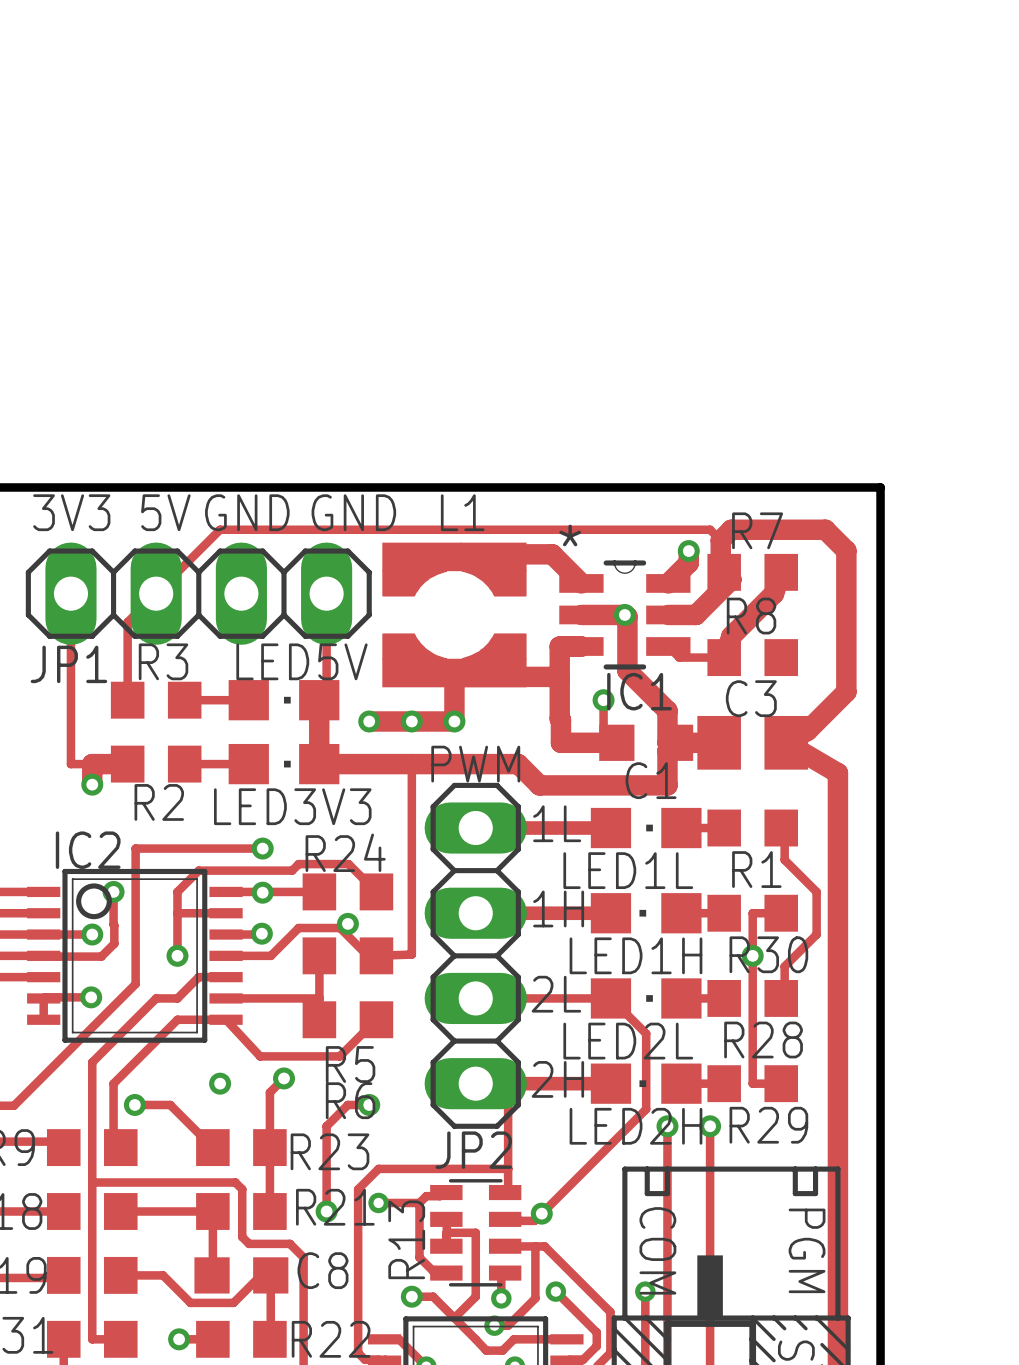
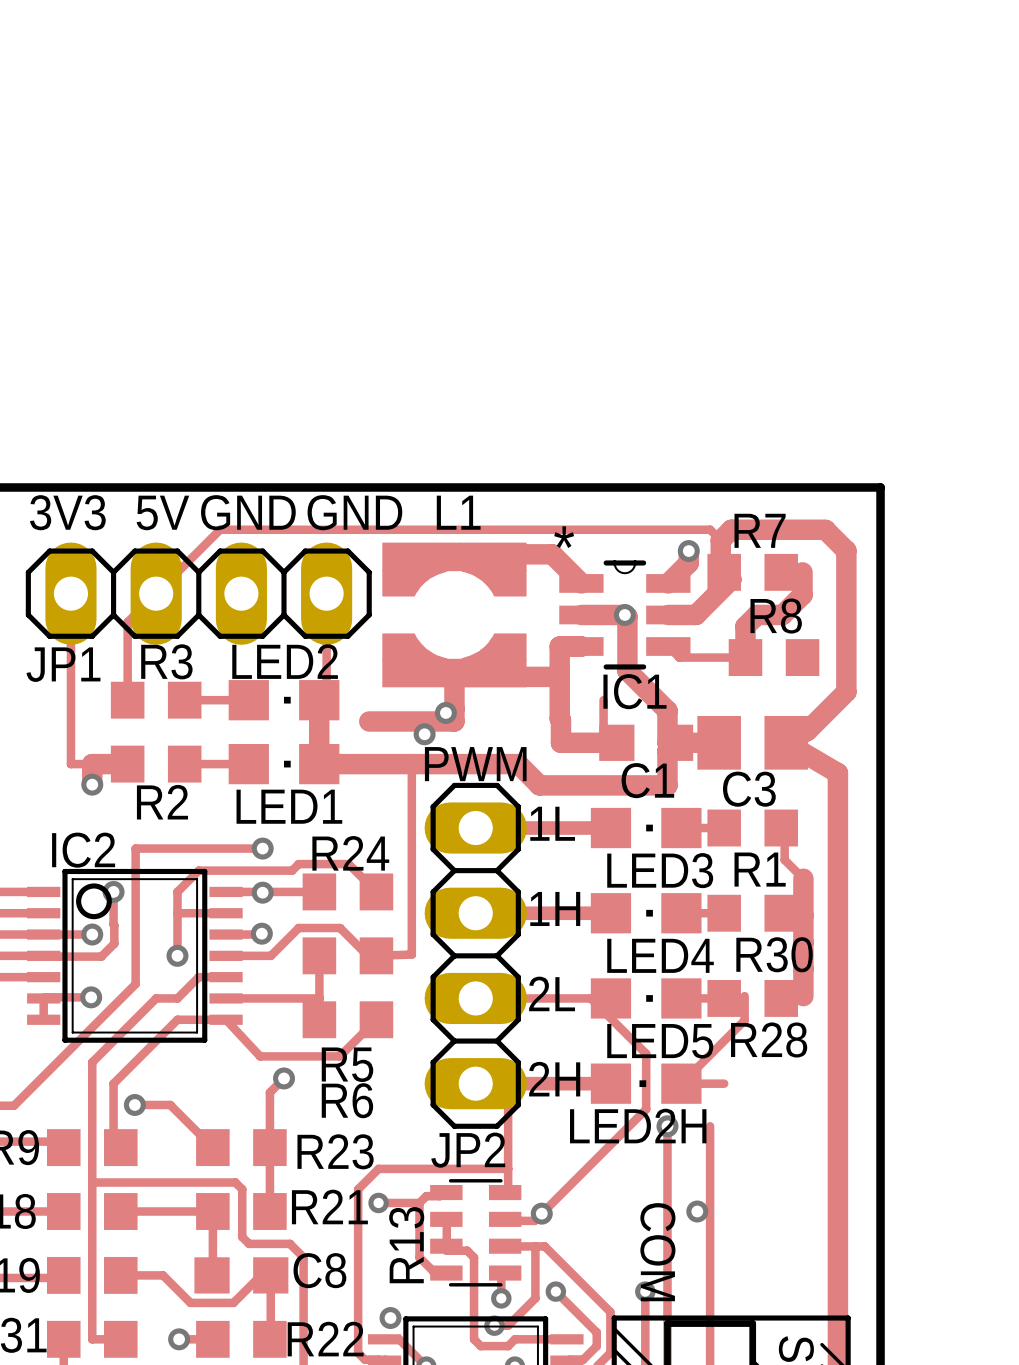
track: (781, 572) (774, 593) (731, 636) (724, 657) -> (802, 572) (802, 594) (782, 614) (756, 614) (745, 626) (745, 657) (724, 657)
R8 position: (752, 657) -> (774, 657)
LED5V name: LED5V (301, 661) -> LED2 (285, 661)
C3 name position: C3 (751, 698) -> C3 (749, 789)
via: (603, 700) -> none
via: (369, 721) -> none
via position: (411, 721) -> (424, 734)
via position: (454, 721) -> (445, 712)
LED3V3 name: LED3V3 (292, 806) -> LED1 (289, 806)
LED1L name: LED1L (628, 870) -> LED3 (660, 870)
track: (803, 878) (816, 891) (816, 934) (784, 966) (784, 998) (781, 998) -> (803, 878) (803, 996)
LED1H: (646, 913) -> none
LED4: none -> (646, 913)
track: (781, 913) (752, 913) (752, 1083) (781, 1083) -> none
via: (347, 923) -> none
via: (752, 955) -> none
track: none -> (744, 996) (744, 1020) (681, 1083)
track: (610, 998) (646, 1033) (646, 1053) -> (590, 998) (646, 1053)
LED2L name: LED2L (628, 1041) -> LED5 (660, 1041)
via: (220, 1083) -> none
R29: (752, 1083) -> none
track: (369, 1104) (347, 1104) (326, 1126) (326, 1211) -> none
via: (369, 1104) -> none
via position: (710, 1126) -> (697, 1211)
line: (837, 1168) (837, 1318) -> none
line: (647, 1169) (647, 1193) (667, 1193) (667, 1169) -> none
line: (795, 1169) (795, 1193) (815, 1193) (815, 1169) -> none
line: (837, 1169) (624, 1169) (624, 1318) (667, 1360) -> none
via: (326, 1211) -> none
track: (446, 1246) (446, 1232) (475, 1232) (475, 1296) (454, 1318) -> none
text: PGM (807, 1250) -> none
drawing: [697, 1255, 723, 1320] -> none
track: (411, 1296) (433, 1296) (486, 1350) (502, 1350) (514, 1339) -> (446, 1246) (446, 1250) (467, 1250) (474, 1257) (474, 1339) (480, 1346) (508, 1346) (514, 1339)
via position: (411, 1296) -> (390, 1318)
line: (646, 1318) (667, 1339) -> none
line: (752, 1318) (774, 1339) -> none
line: (774, 1318) (784, 1328) -> none
line: (795, 1318) (805, 1328) -> none
line: (816, 1318) (848, 1349) -> none
line: (752, 1339) (774, 1360) -> none

